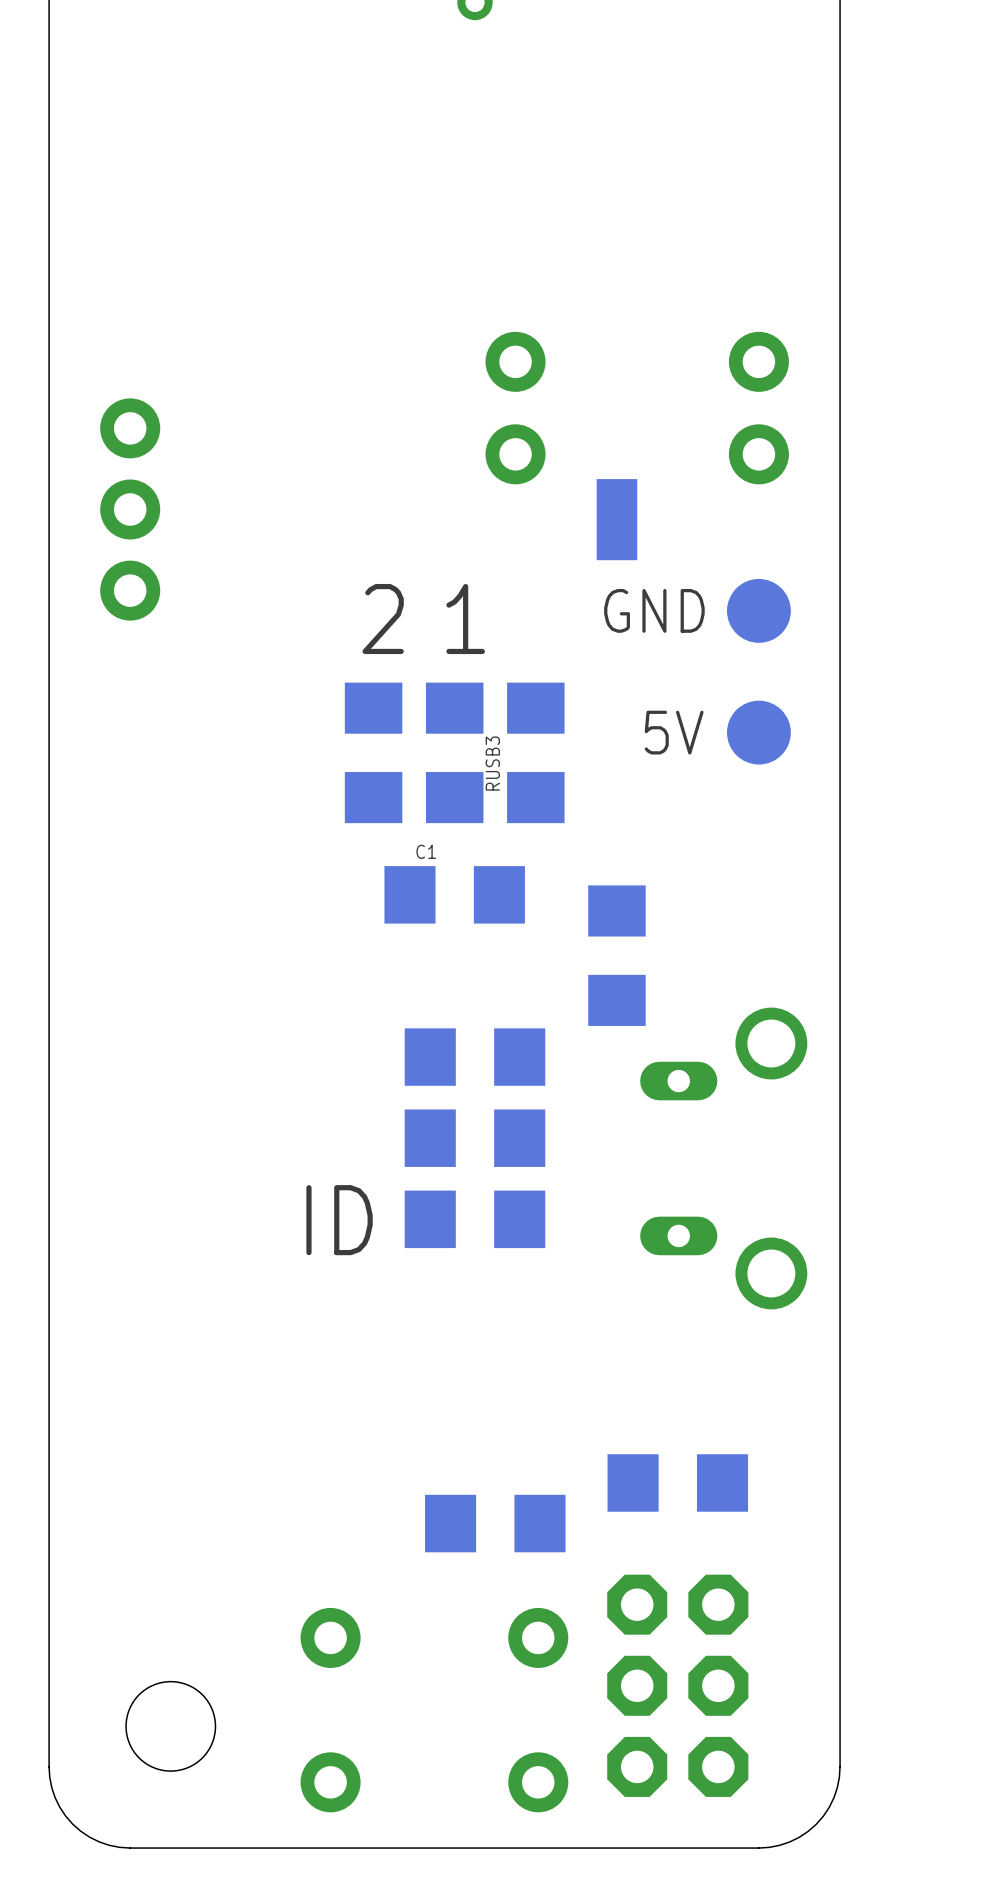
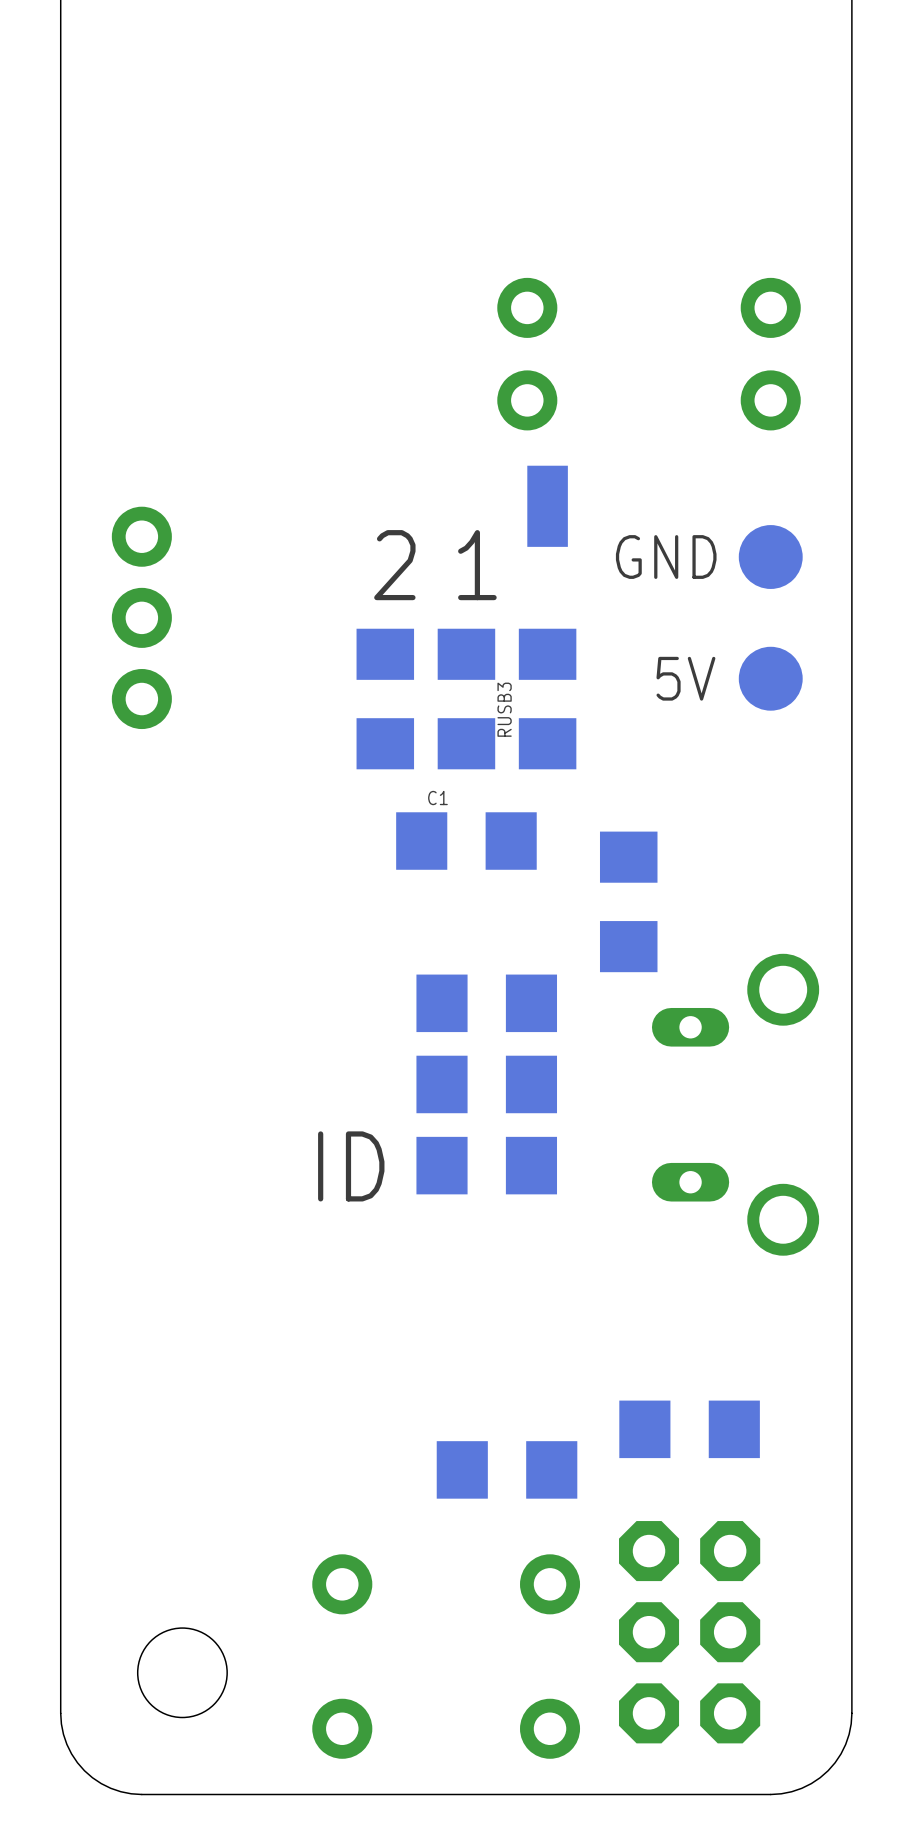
part position: (130, 509) -> (141, 617)
part position: (616, 519) -> (547, 506)

